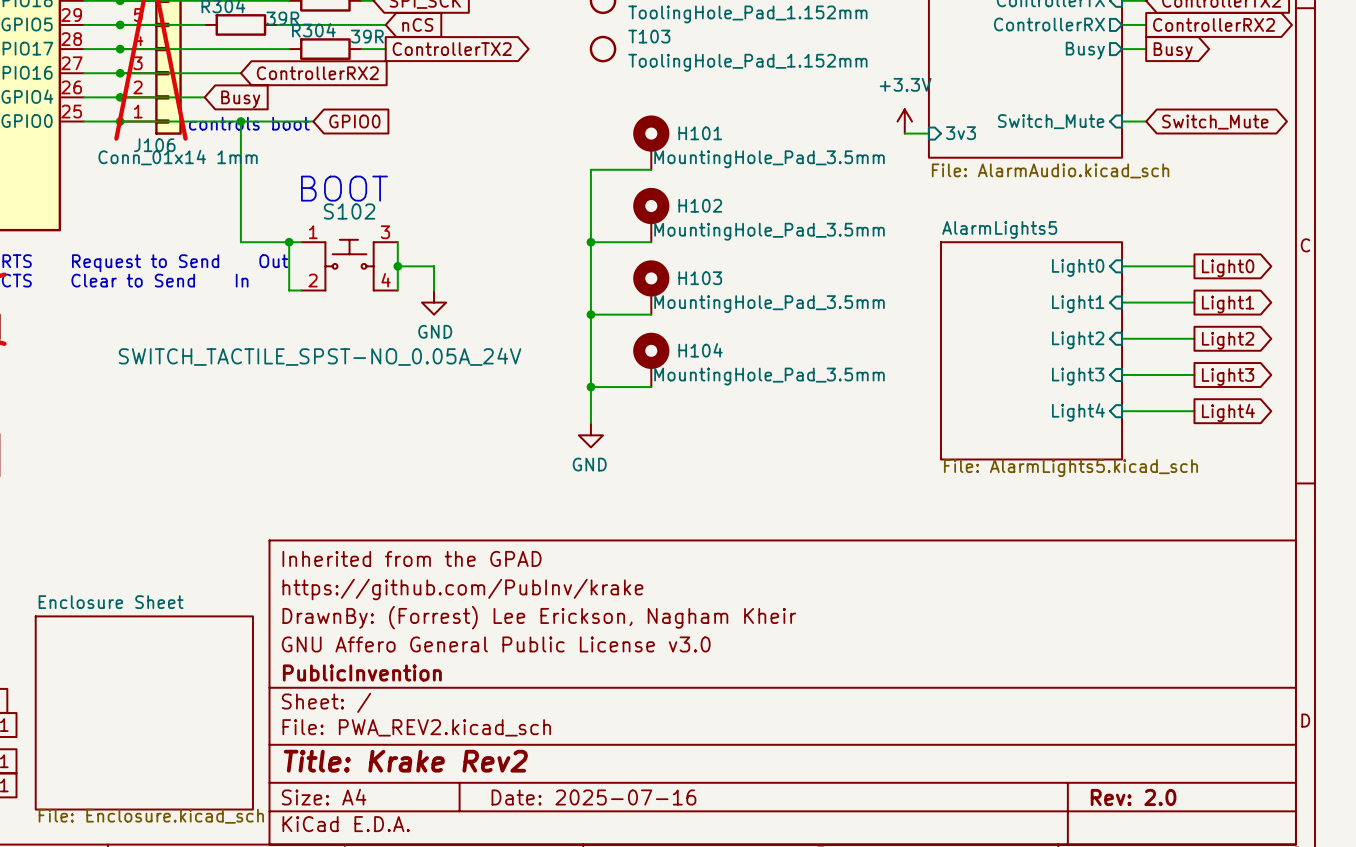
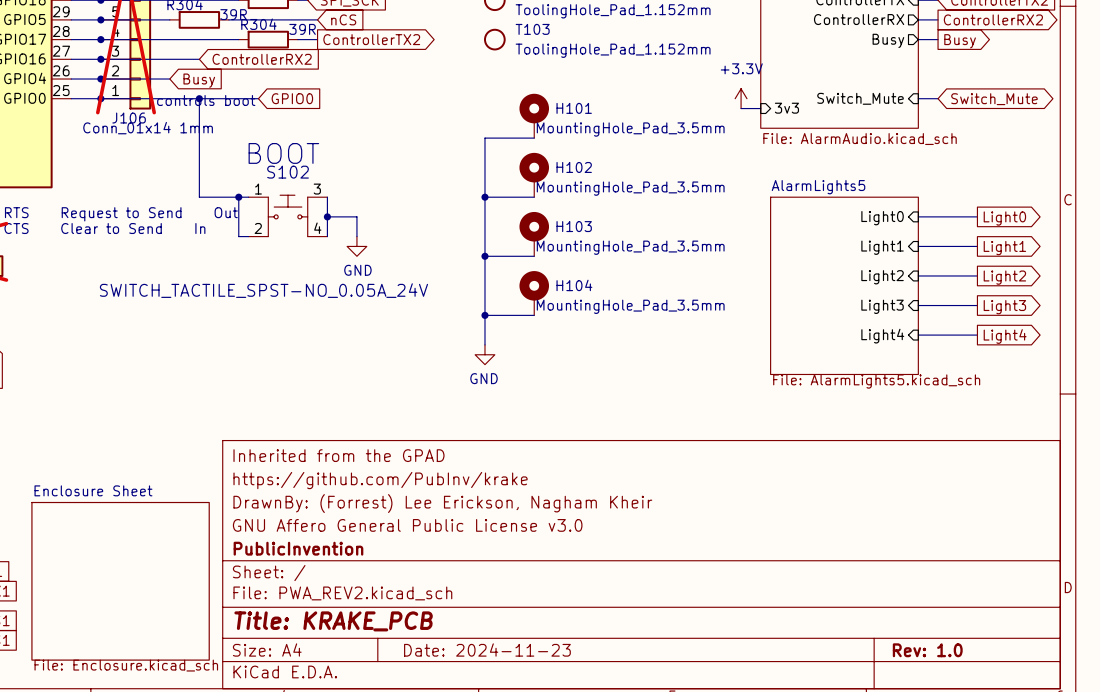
title block: Title: Krake Rev2 (405, 761) -> Title: KRAKE_PCB (333, 621)
title block: Date: 2025-07-16 (593, 797) -> Date: 2024-11-23 (487, 650)
title block: Rev: 2.0 (1133, 797) -> Rev: 1.0 (927, 650)

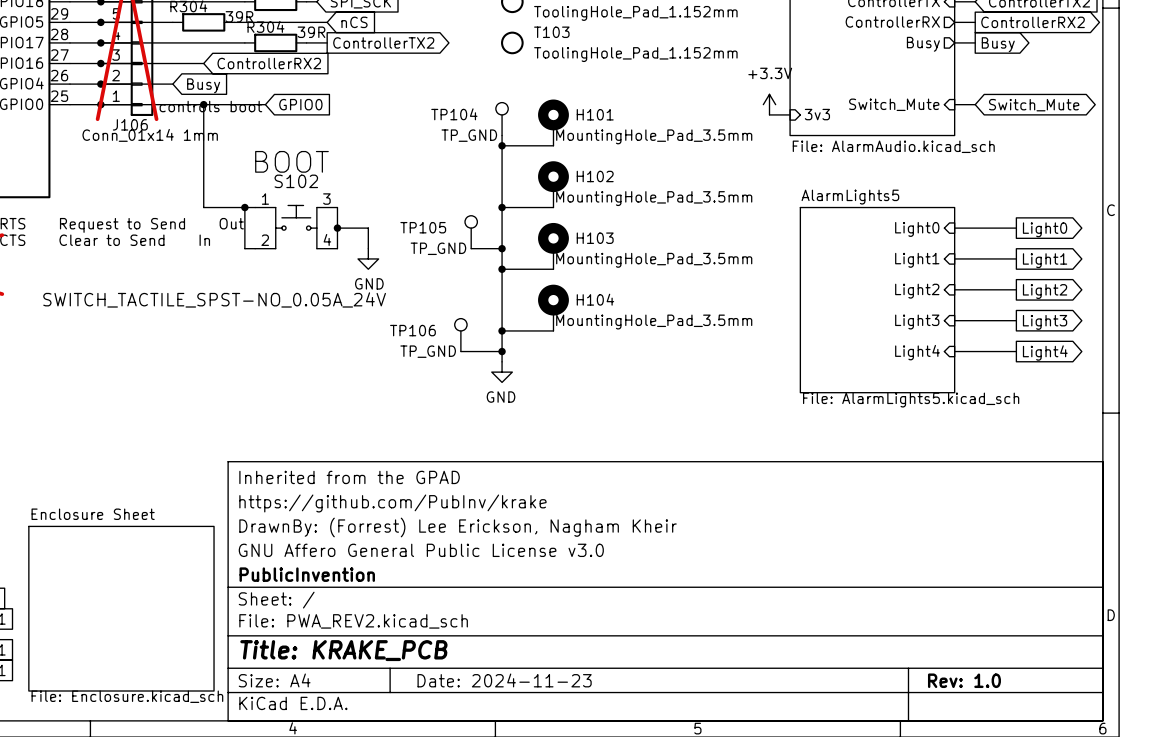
TP104: none -> TP_GND (502, 119)
wire: none -> (502, 135) (502, 145)
junction: none -> (502, 145)
TP105: none -> TP_GND (471, 232)
wire: none -> (471, 248) (502, 248)
junction: none -> (502, 248)
S102 value position: SWITCH_TACTILE_SPST-NO_0.05A_24V (263, 290) -> SWITCH_TACTILE_SPST-NO_0.05A_24V (214, 299)
TP106: none -> TP_GND (460, 335)
wire: none -> (460, 351) (502, 351)
junction: none -> (502, 351)

